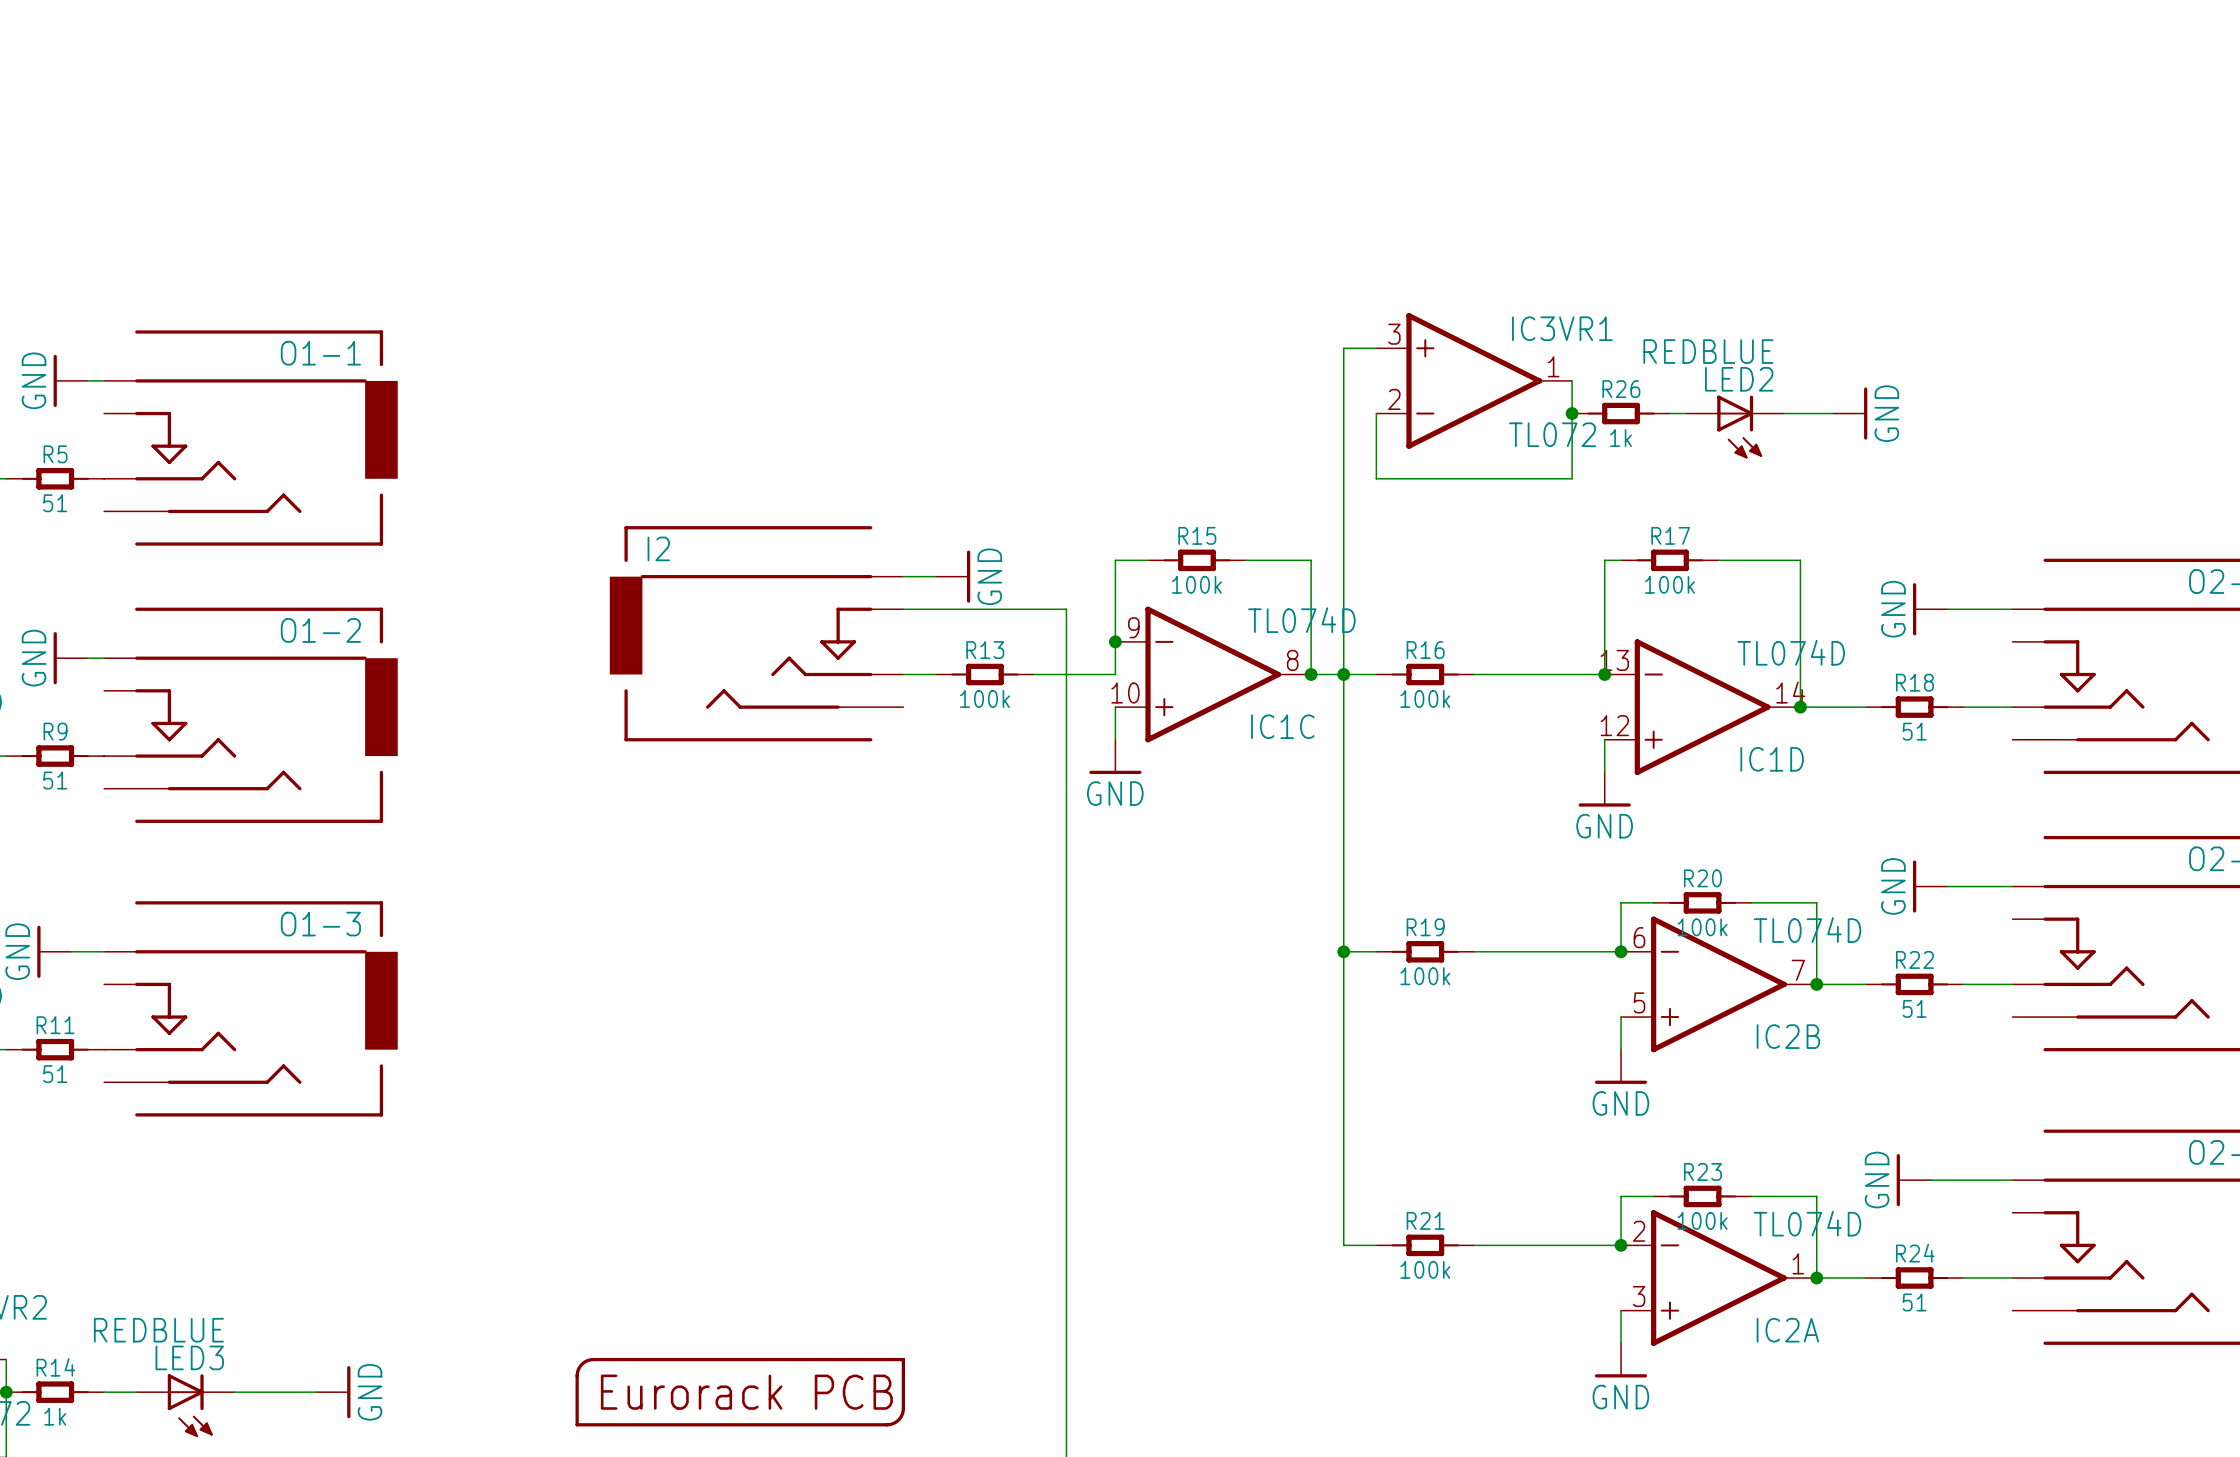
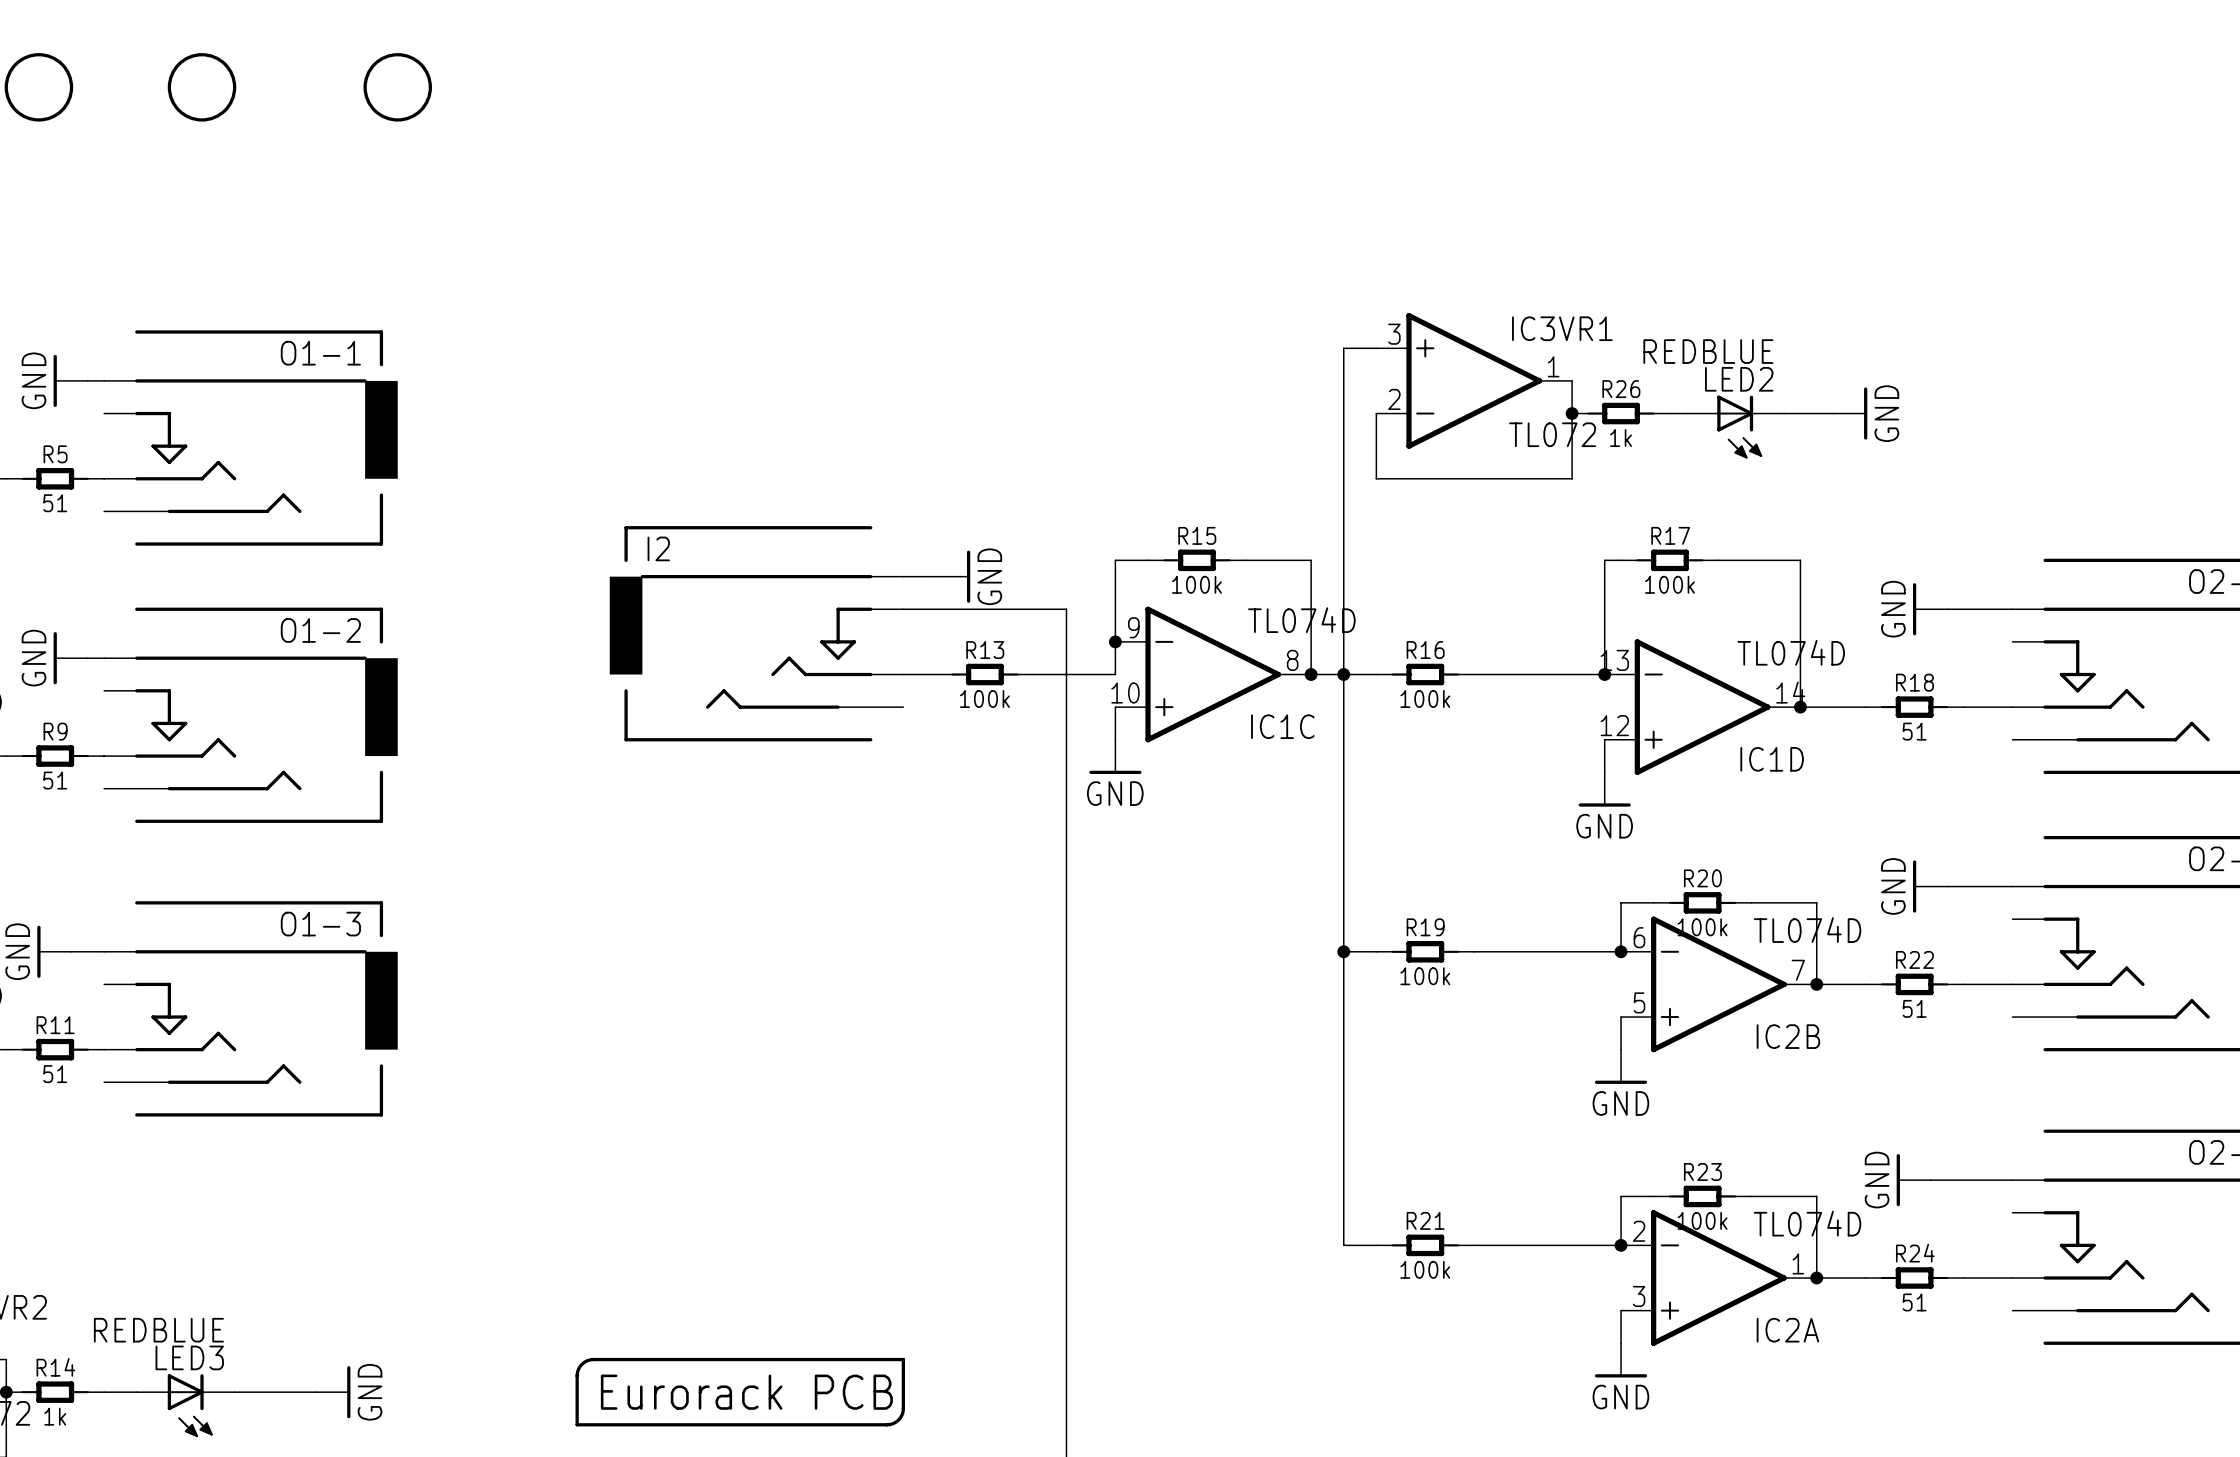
part: none -> (38, 87)
part: none -> (202, 87)
part: none -> (397, 87)

